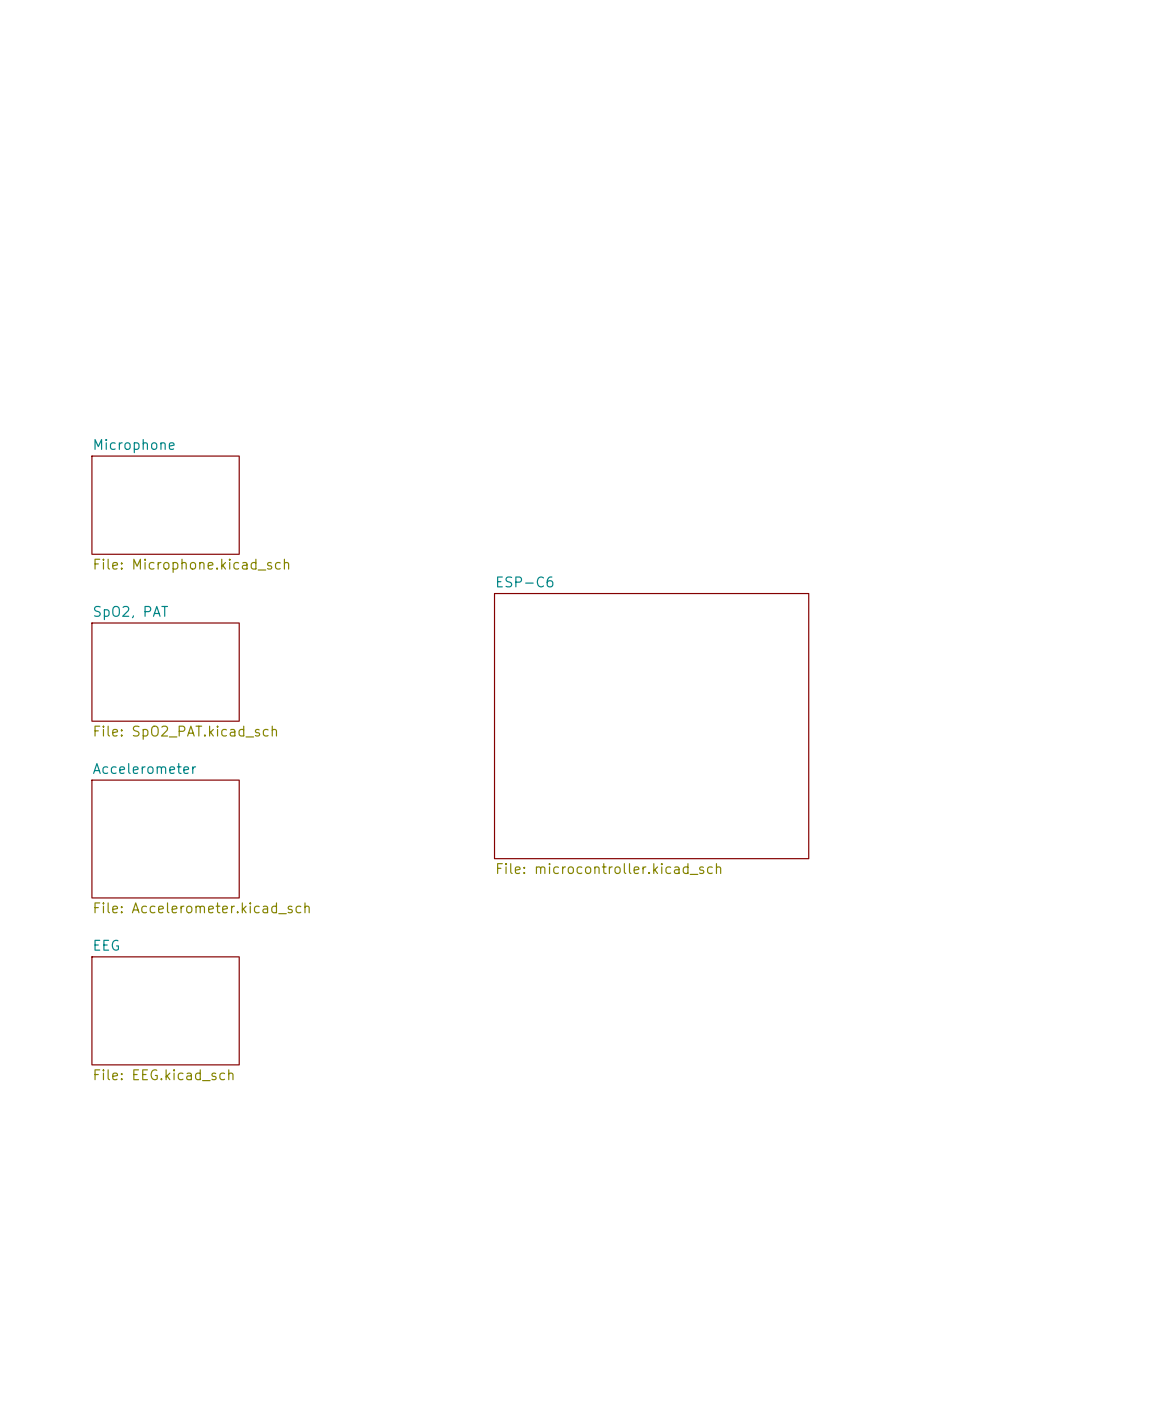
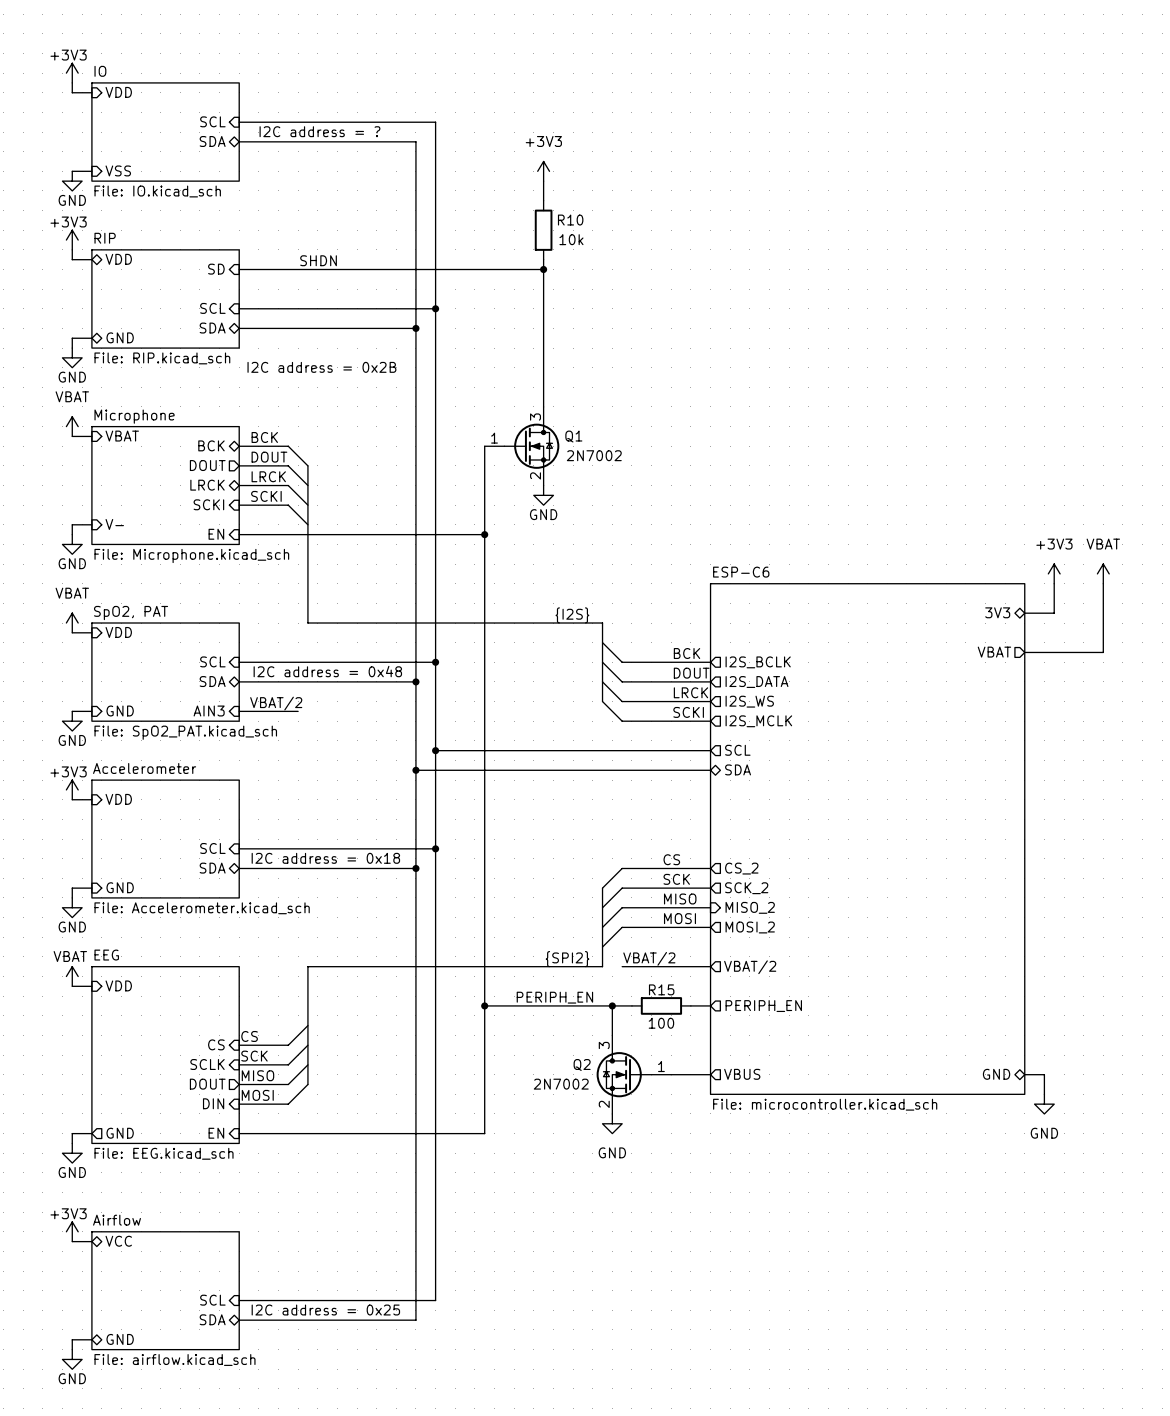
power symbol: none -> +3V3 (72, 73)
wire: none -> (72, 82) (72, 92) (91, 92)
sheet pin: none -> VDD (118, 92)
sheet pin: none -> SCL (212, 121)
wire: none -> (239, 122) (435, 122) (435, 1300) (239, 1300)
text: none -> I2C address = ? (319, 131)
sheet IO: none -> File: IO.kicad_sch (165, 132)
sheet pin: none -> SDA (212, 141)
wire: none -> (239, 141) (415, 141) (415, 1320) (239, 1320)
sheet pin: none -> VSS (118, 170)
wire: none -> (72, 171) (91, 171)
power symbol: none -> +3V3 (543, 171)
power symbol: none -> GND (72, 181)
wire: none -> (543, 181) (543, 200)
R10: none -> 10k (543, 230)
power symbol: none -> +3V3 (72, 240)
wire: none -> (72, 249) (72, 259) (91, 259)
sheet pin: none -> VDD (118, 259)
wire: none -> (543, 259) (543, 406)
label: none -> SHDN (318, 260)
sheet pin: none -> SD (216, 269)
wire: none -> (239, 269) (543, 269)
junction: none -> (543, 269)
sheet RIP: none -> File: RIP.kicad_sch (165, 298)
sheet pin: none -> SCL (212, 308)
wire: none -> (239, 308) (435, 308)
junction: none -> (435, 308)
sheet pin: none -> SDA (212, 328)
wire: none -> (239, 328) (415, 328)
junction: none -> (415, 328)
sheet pin: none -> GND (120, 337)
wire: none -> (91, 338) (72, 338) (72, 348)
power symbol: none -> GND (72, 357)
text: none -> I2C address = 0x2B (321, 367)
power symbol: none -> VBAT (72, 426)
wire: none -> (72, 436) (91, 436)
sheet pin: none -> VBAT (122, 436)
label: none -> BCK (264, 437)
sheet pin: none -> BCK (211, 445)
wire: none -> (239, 446) (288, 446) (307, 465)
wire: none -> (484, 446) (484, 1133) (239, 1133)
Q1: none -> 2N7002 (522, 446)
label: none -> DOUT (269, 457)
sheet pin: none -> DOUT (207, 465)
wire: none -> (239, 465) (288, 465) (307, 485)
bus: none -> (307, 465) (307, 623) (602, 623) (602, 701)
label: none -> LRCK (268, 476)
sheet Microphone: none -> File: Microphone.kicad_sch (165, 485)
sheet pin: none -> LRCK (207, 485)
wire: none -> (239, 485) (288, 485) (307, 505)
power symbol: none -> GND (543, 495)
label: none -> SCKI (266, 496)
sheet pin: none -> SCKI (208, 504)
sheet Microphone: File: Microphone.kicad_sch (165, 505) -> none
wire: none -> (239, 505) (288, 505) (307, 524)
wire: none -> (91, 524) (72, 524) (72, 534)
sheet pin: none -> V- (114, 524)
sheet pin: none -> EN (216, 534)
wire: none -> (239, 534) (484, 534)
junction: none -> (484, 534)
power symbol: none -> GND (72, 544)
power symbol: none -> +3V3 (1054, 573)
power symbol: none -> VBAT (1103, 573)
sheet ESP-C6 name position: ESP-C6 (525, 581) -> ESP-C6 (741, 572)
wire: none -> (1054, 583) (1054, 613) (1024, 613)
wire: none -> (1103, 583) (1103, 652) (1024, 652)
sheet ESP-C6 shape: [493, 592, 810, 860] -> [709, 583, 1026, 1095]
sheet pin: none -> 3V3 (997, 612)
label: none -> {I2S} (572, 615)
power symbol: none -> VBAT (72, 623)
wire: none -> (72, 632) (91, 632)
sheet pin: none -> VDD (118, 632)
wire: none -> (602, 642) (622, 662) (710, 662)
sheet pin: none -> VBAT (994, 652)
label: none -> BCK (687, 653)
sheet pin: none -> SCL (212, 661)
wire: none -> (239, 662) (435, 662)
junction: none -> (435, 662)
wire: none -> (602, 662) (622, 681) (710, 681)
sheet pin: none -> I2S_BCLK (758, 662)
text: none -> I2C address = 0x48 (327, 671)
label: none -> DOUT (691, 673)
sheet pin: none -> SDA (212, 681)
wire: none -> (239, 681) (415, 681)
junction: none -> (415, 681)
wire: none -> (602, 681) (622, 701) (710, 701)
sheet pin: none -> I2S_DATA (756, 682)
label: none -> LRCK (690, 692)
wire: none -> (602, 701) (622, 721) (710, 721)
sheet pin: none -> I2S_WS (749, 701)
label: none -> VBAT/2 (276, 703)
wire: none -> (72, 711) (91, 711)
sheet pin: none -> GND (120, 711)
sheet pin: none -> AIN3 (209, 711)
wire: none -> (239, 711) (298, 711)
label: none -> SCKI (688, 712)
power symbol: none -> GND (72, 721)
sheet pin: none -> I2S_MCLK (758, 721)
wire: none -> (435, 750) (710, 750)
junction: none -> (435, 750)
sheet pin: none -> SCL (737, 750)
sheet pin: none -> SDA (738, 769)
wire: none -> (415, 770) (710, 770)
junction: none -> (415, 770)
power symbol: none -> +3V3 (72, 789)
wire: none -> (72, 799) (91, 799)
sheet pin: none -> VDD (118, 799)
sheet pin: none -> SCL (212, 848)
wire: none -> (239, 848) (435, 848)
junction: none -> (435, 848)
text: none -> I2C address = 0x18 (325, 858)
label: none -> CS (671, 859)
sheet pin: none -> SDA (212, 868)
wire: none -> (239, 868) (415, 868)
junction: none -> (415, 868)
wire: none -> (710, 868) (622, 868) (602, 888)
sheet pin: none -> CS_2 (741, 868)
sheet ESP-C6 value position: File: microcontroller.kicad_sch (609, 869) -> File: microcontroller.kicad_sch (825, 1104)
label: none -> SCK (676, 879)
sheet pin: none -> GND (120, 887)
wire: none -> (91, 888) (72, 888) (72, 897)
bus: none -> (602, 888) (602, 966) (307, 966) (307, 1084)
wire: none -> (710, 888) (622, 888) (602, 907)
sheet pin: none -> SCK_2 (746, 888)
label: none -> MISO (680, 899)
power symbol: none -> GND (72, 907)
wire: none -> (710, 907) (622, 907) (602, 927)
sheet pin: none -> MISO_2 (750, 907)
label: none -> MOSI (679, 918)
wire: none -> (710, 927) (622, 927) (602, 947)
sheet pin: none -> MOSI_2 (750, 927)
label: none -> VBAT/2 (649, 958)
label: none -> {SPI2} (567, 959)
wire: none -> (622, 966) (710, 966)
sheet pin: none -> VBAT/2 (750, 967)
power symbol: none -> VBAT (72, 976)
sheet pin: none -> VDD (118, 985)
wire: none -> (72, 986) (91, 986)
label: none -> PERIPH_EN (554, 997)
wire: none -> (484, 1005) (631, 1005)
junction: none -> (484, 1005)
wire: none -> (612, 1005) (612, 1035)
junction: none -> (612, 1005)
R15: none -> 100 (661, 1005)
wire: none -> (690, 1005) (710, 1005)
sheet pin: none -> PERIPH_EN (763, 1006)
sheet EEG: File: EEG.kicad_sch (165, 1010) -> none
wire: none -> (307, 1025) (288, 1045) (239, 1045)
label: none -> CS (249, 1036)
sheet pin: none -> CS (216, 1044)
wire: none -> (307, 1045) (288, 1064) (239, 1064)
sheet EEG: none -> File: EEG.kicad_sch (165, 1055)
label: none -> SCK (254, 1056)
sheet pin: none -> SCLK (207, 1064)
wire: none -> (307, 1064) (288, 1084) (239, 1084)
Q2: none -> 2N7002 (633, 1074)
wire: none -> (671, 1074) (710, 1074)
sheet pin: none -> VBUS (742, 1074)
sheet pin: none -> GND (996, 1074)
wire: none -> (1024, 1074) (1044, 1074) (1044, 1094)
label: none -> MISO (257, 1075)
sheet pin: none -> DOUT (207, 1084)
wire: none -> (307, 1084) (288, 1104) (239, 1104)
label: none -> MOSI (257, 1095)
sheet pin: none -> DIN (213, 1103)
power symbol: none -> GND (1044, 1104)
power symbol: none -> GND (612, 1123)
wire: none -> (91, 1133) (72, 1133) (72, 1143)
sheet pin: none -> GND (120, 1133)
sheet pin: none -> EN (216, 1133)
power symbol: none -> GND (72, 1153)
power symbol: none -> +3V3 (72, 1231)
wire: none -> (72, 1241) (91, 1241)
sheet pin: none -> VCC (118, 1241)
sheet Airflow: none -> File: airflow.kicad_sch (165, 1290)
sheet pin: none -> SCL (212, 1300)
text: none -> I2C address = 0x25 (325, 1310)
sheet pin: none -> SDA (212, 1319)
wire: none -> (91, 1339) (72, 1339) (72, 1349)
sheet pin: none -> GND (120, 1339)
power symbol: none -> GND (72, 1359)

